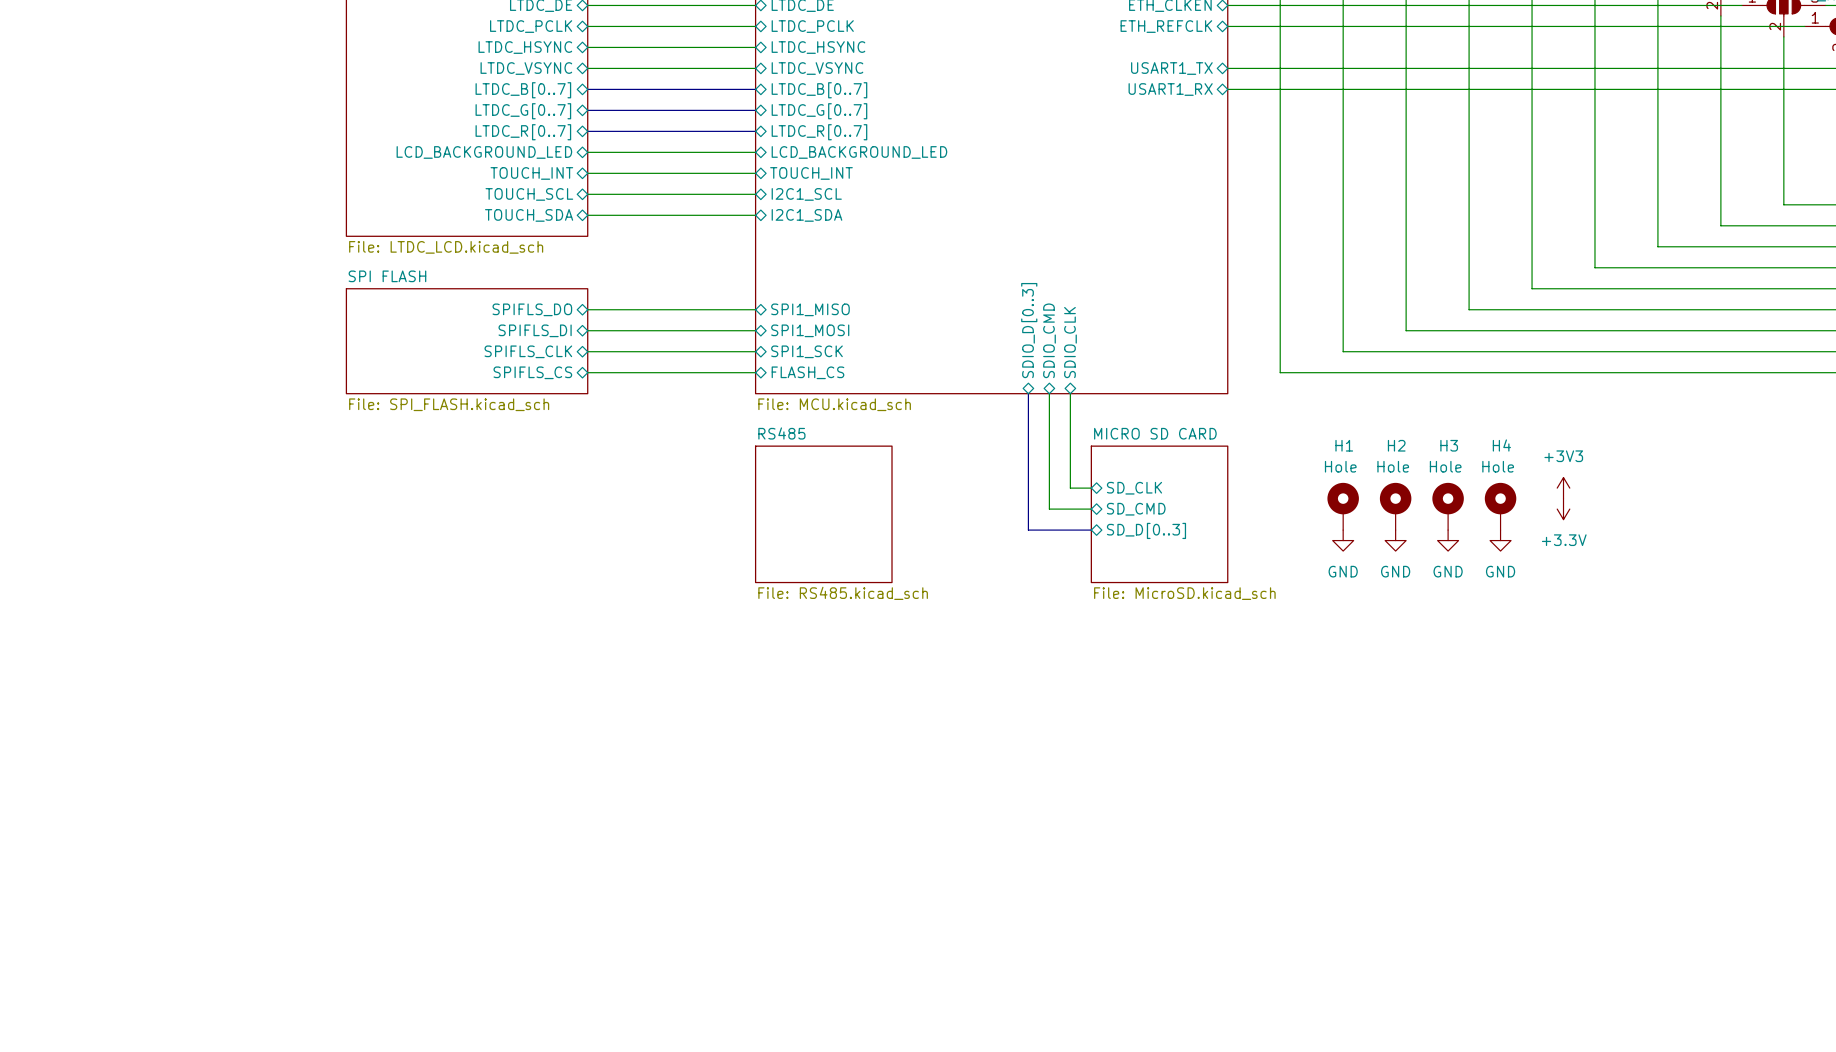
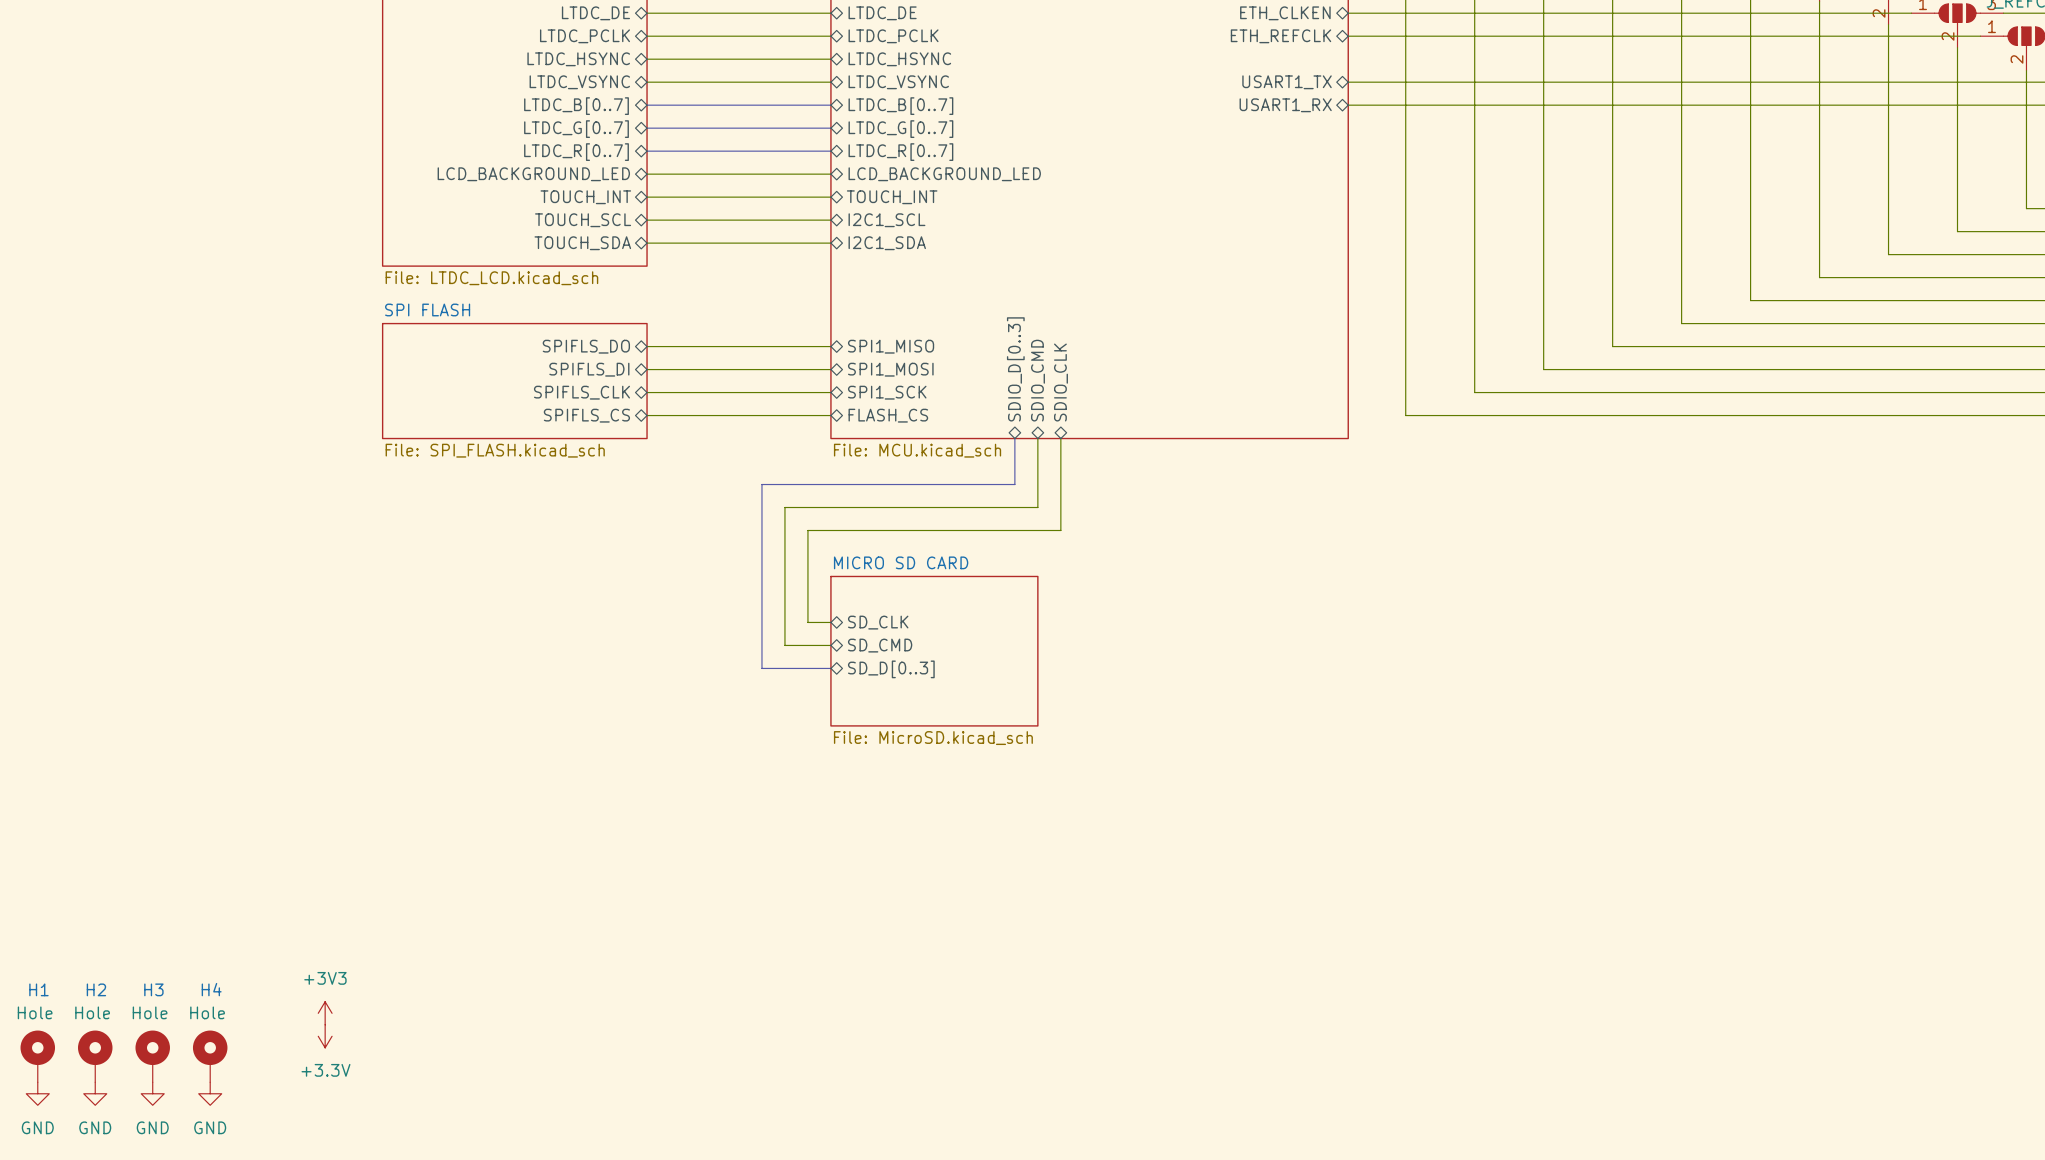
sheet pin position: SDIO_D[0..3] (1029, 330) -> SDIO_D[0..3] (1015, 369)
sheet pin position: SDIO_CMD (1049, 340) -> SDIO_CMD (1037, 380)
sheet pin position: SDIO_CLK (1070, 342) -> SDIO_CLK (1060, 382)
bus: none -> (1014, 438) (1014, 484) (761, 484) (761, 668) (830, 668)
wire: none -> (1037, 438) (1037, 507) (784, 507) (784, 645) (830, 645)
wire: none -> (1060, 438) (1060, 530) (807, 530) (807, 622) (830, 622)
bus: (1028, 393) (1028, 530) (1091, 530) -> none
wire: (1049, 393) (1049, 509) (1091, 509) -> none
wire: (1070, 393) (1070, 488) (1091, 488) -> none
sheet pin: SD_CLK (1134, 488) -> none
power symbol: +3V3 (1563, 488) -> none
H1 position: (1343, 506) -> (37, 1056)
H2 position: (1395, 506) -> (95, 1056)
H3 position: (1448, 506) -> (152, 1056)
H4 position: (1500, 506) -> (210, 1056)
sheet pin: SD_CMD (1136, 509) -> none
power symbol: +3.3V (1563, 509) -> none
sheet RS485: File: RS485.kicad_sch (823, 514) -> none
sheet MICRO SD CARD: File: MicroSD.kicad_sch (1159, 514) -> none
sheet pin: SD_D[0..3] (1146, 530) -> none
power symbol: GND (1343, 540) -> none
power symbol: GND (1395, 540) -> none
power symbol: GND (1448, 540) -> none
power symbol: GND (1500, 540) -> none
sheet pin: none -> SD_CLK (878, 622)
sheet pin: none -> SD_CMD (880, 645)
sheet MICRO SD CARD: none -> File: MicroSD.kicad_sch (934, 651)
sheet pin: none -> SD_D[0..3] (891, 669)
power symbol: none -> +3V3 (325, 1013)
power symbol: none -> +3.3V (325, 1036)
power symbol: none -> GND (37, 1093)
power symbol: none -> GND (95, 1093)
power symbol: none -> GND (152, 1093)
power symbol: none -> GND (210, 1093)

